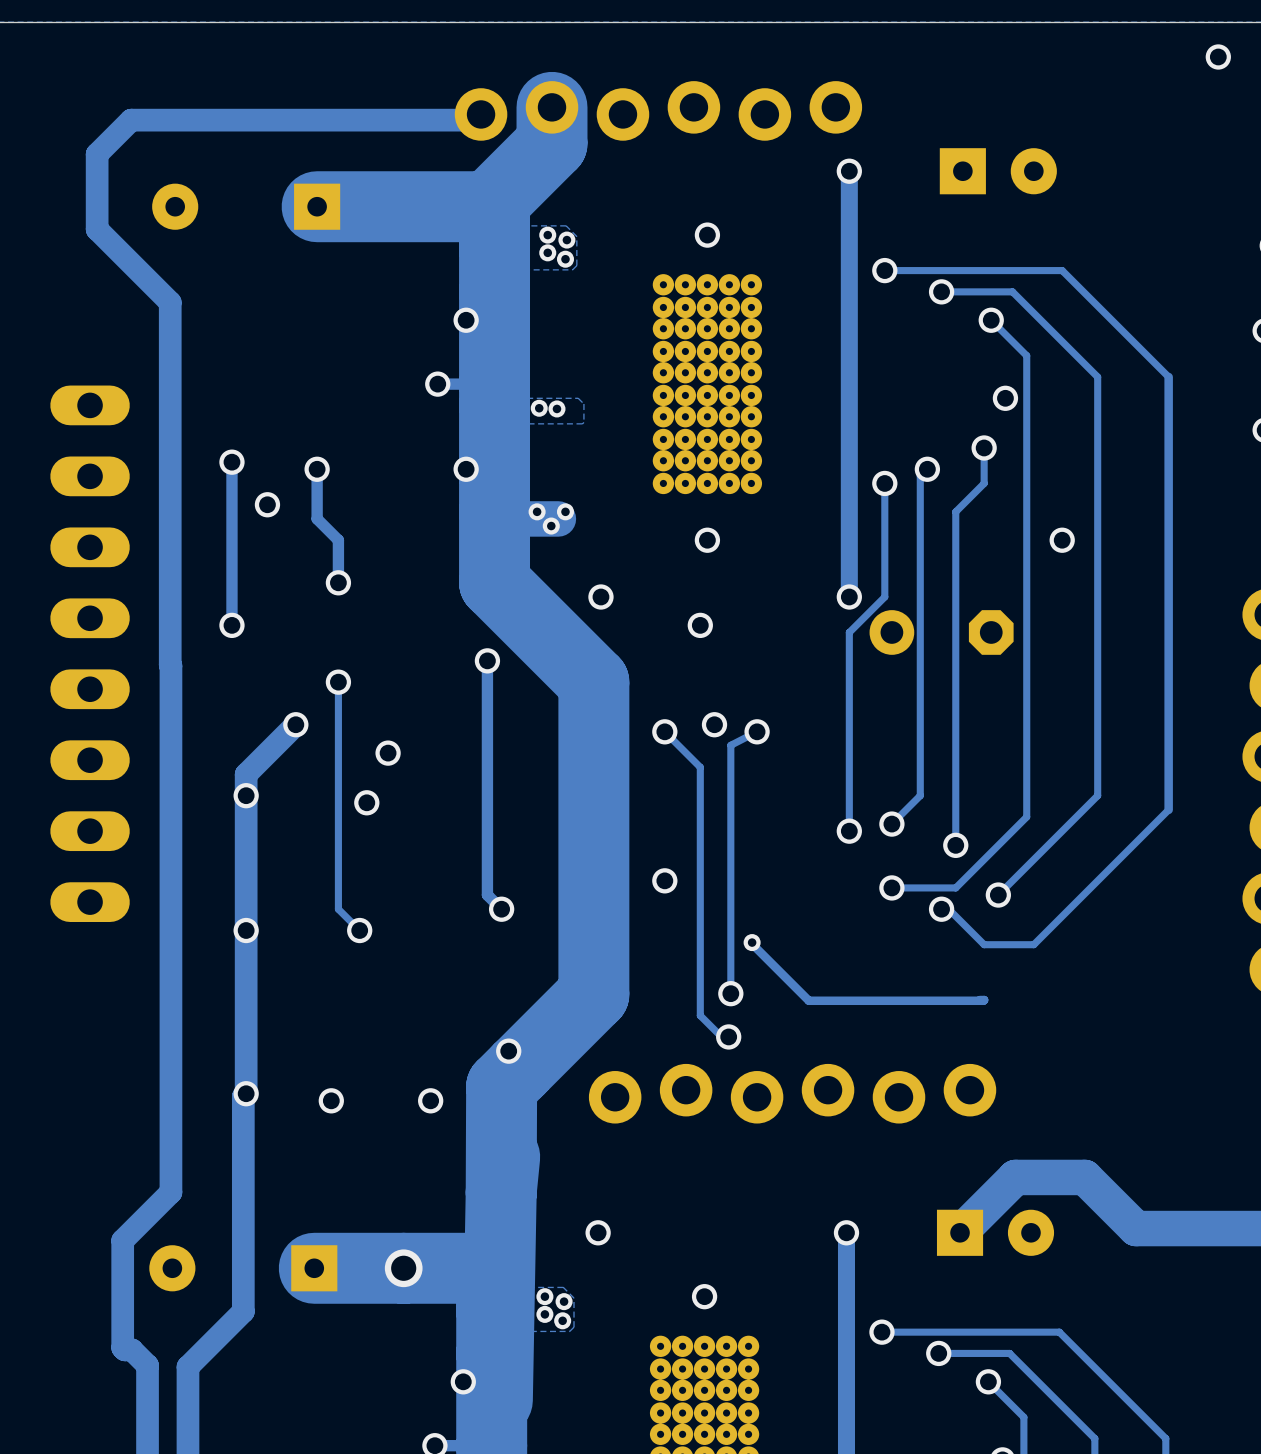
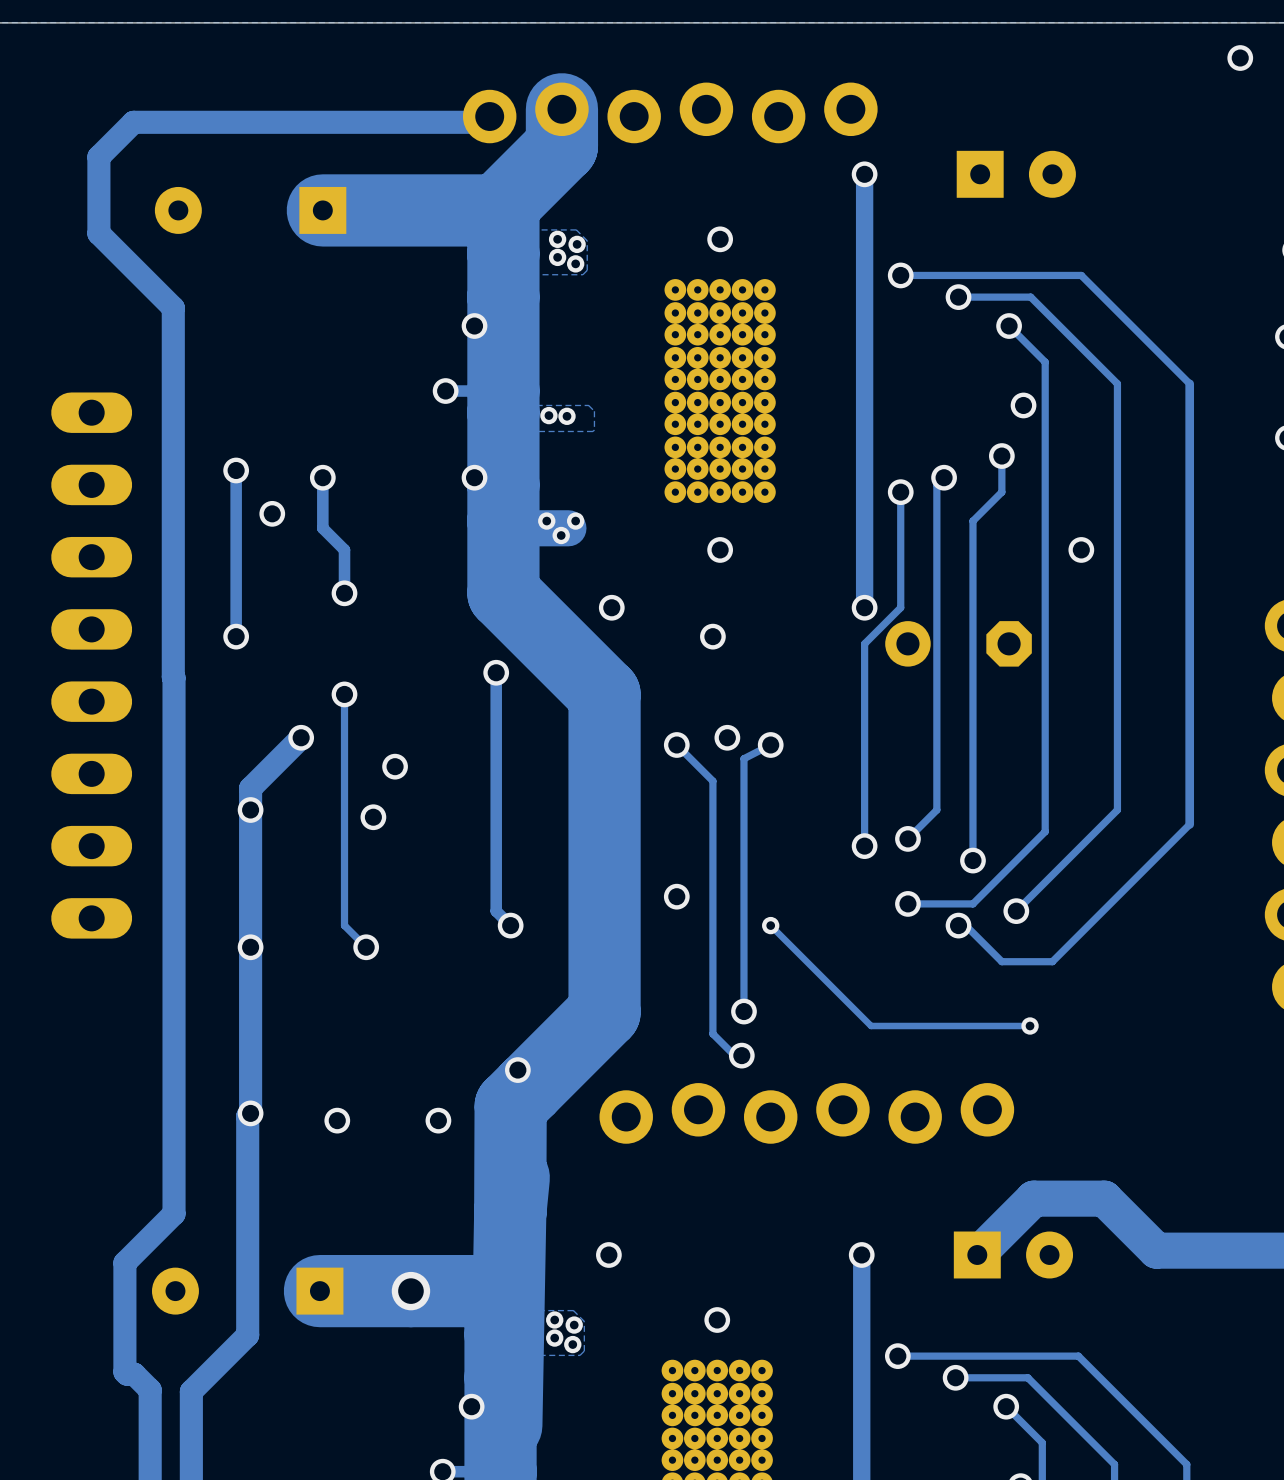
track: none -> (770, 925) (871, 1026) (1030, 1026)
track: (752, 942) (808, 1000) (984, 1000) (979, 1000) -> none
via position: (752, 942) -> (770, 925)
via: none -> (1030, 1026)

